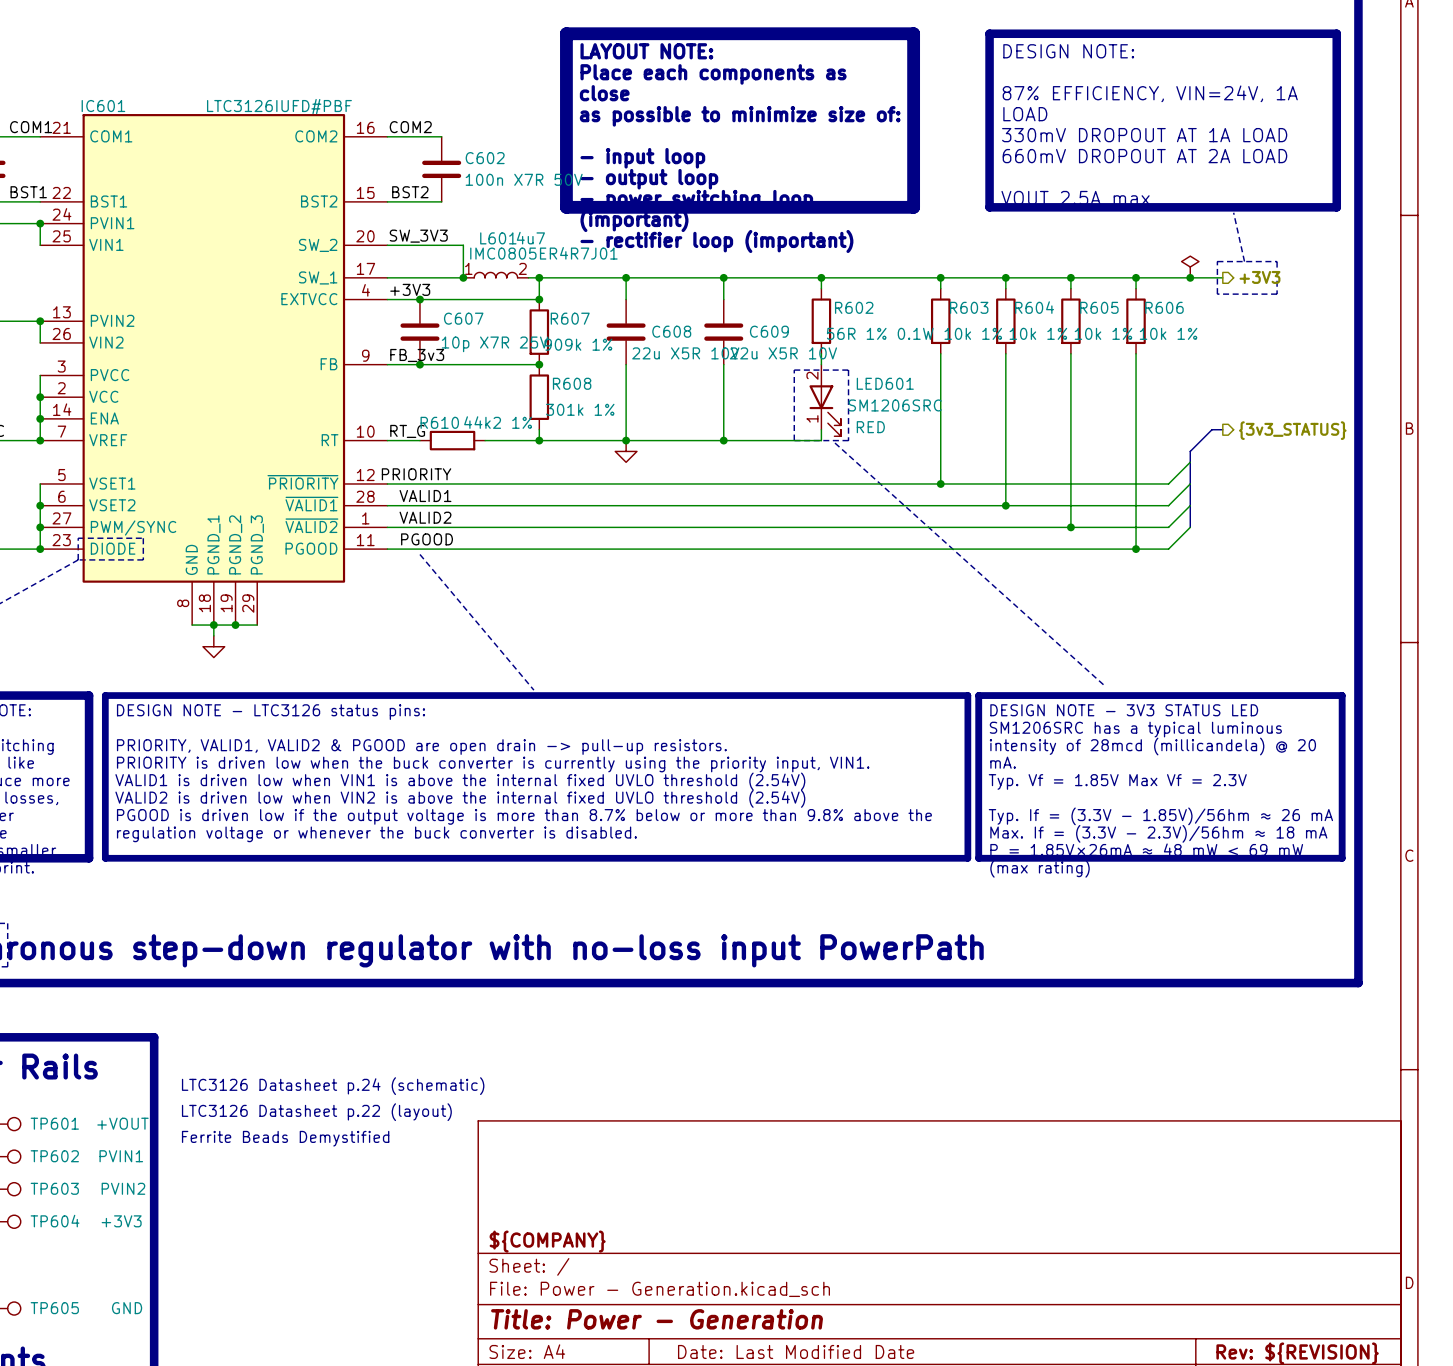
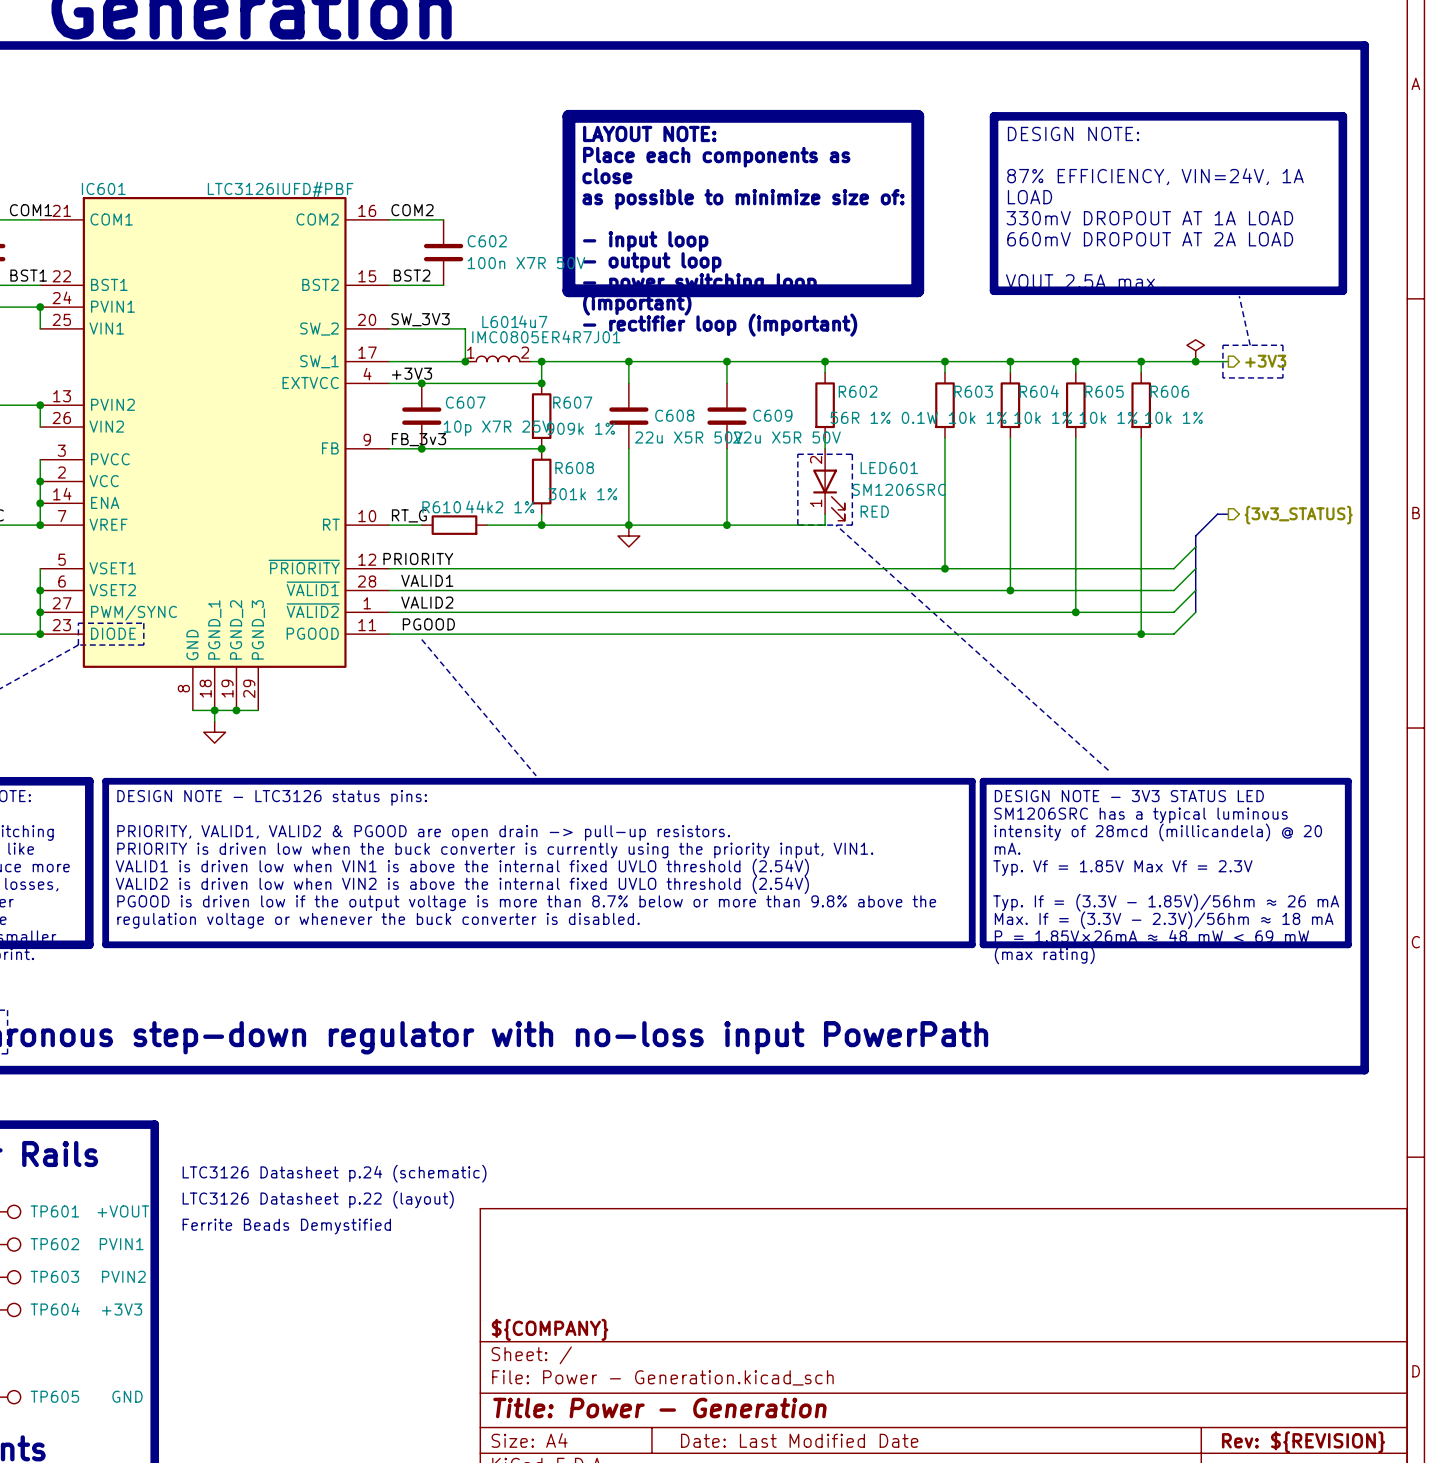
C608 value: 22u X5R 10V (685, 353) -> 22u X5R 50V (688, 437)
C609 value: 22u X5R 10V (783, 353) -> 22u X5R 50V (786, 437)

